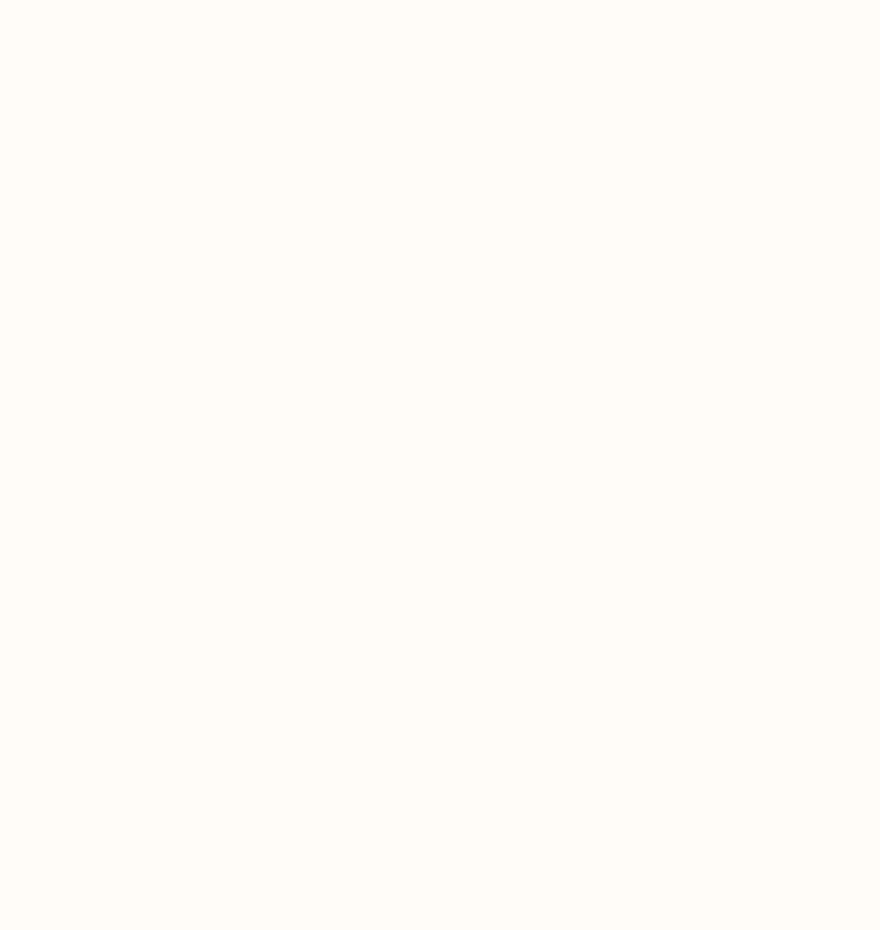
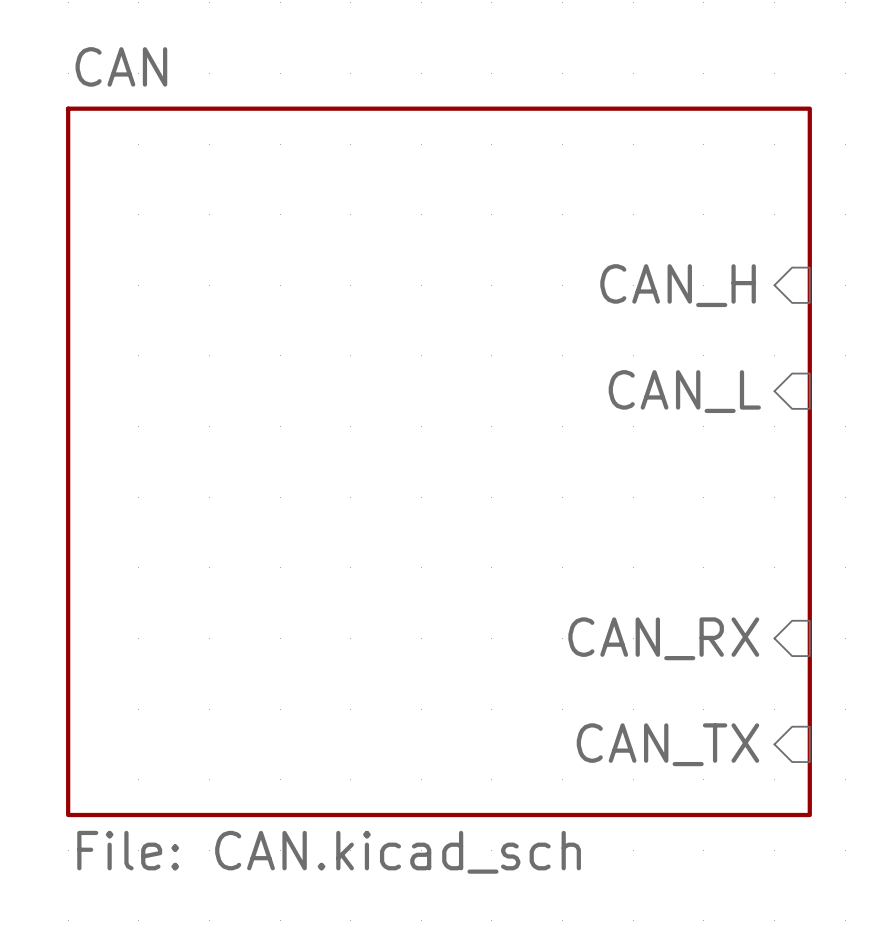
sheet pin: none -> CAN_H (678, 285)
sheet pin: none -> CAN_L (684, 391)
sheet CAN: none -> File: CAN.kicad_sch (438, 461)
sheet pin: none -> CAN_RX (663, 638)
sheet pin: none -> CAN_TX (667, 744)

